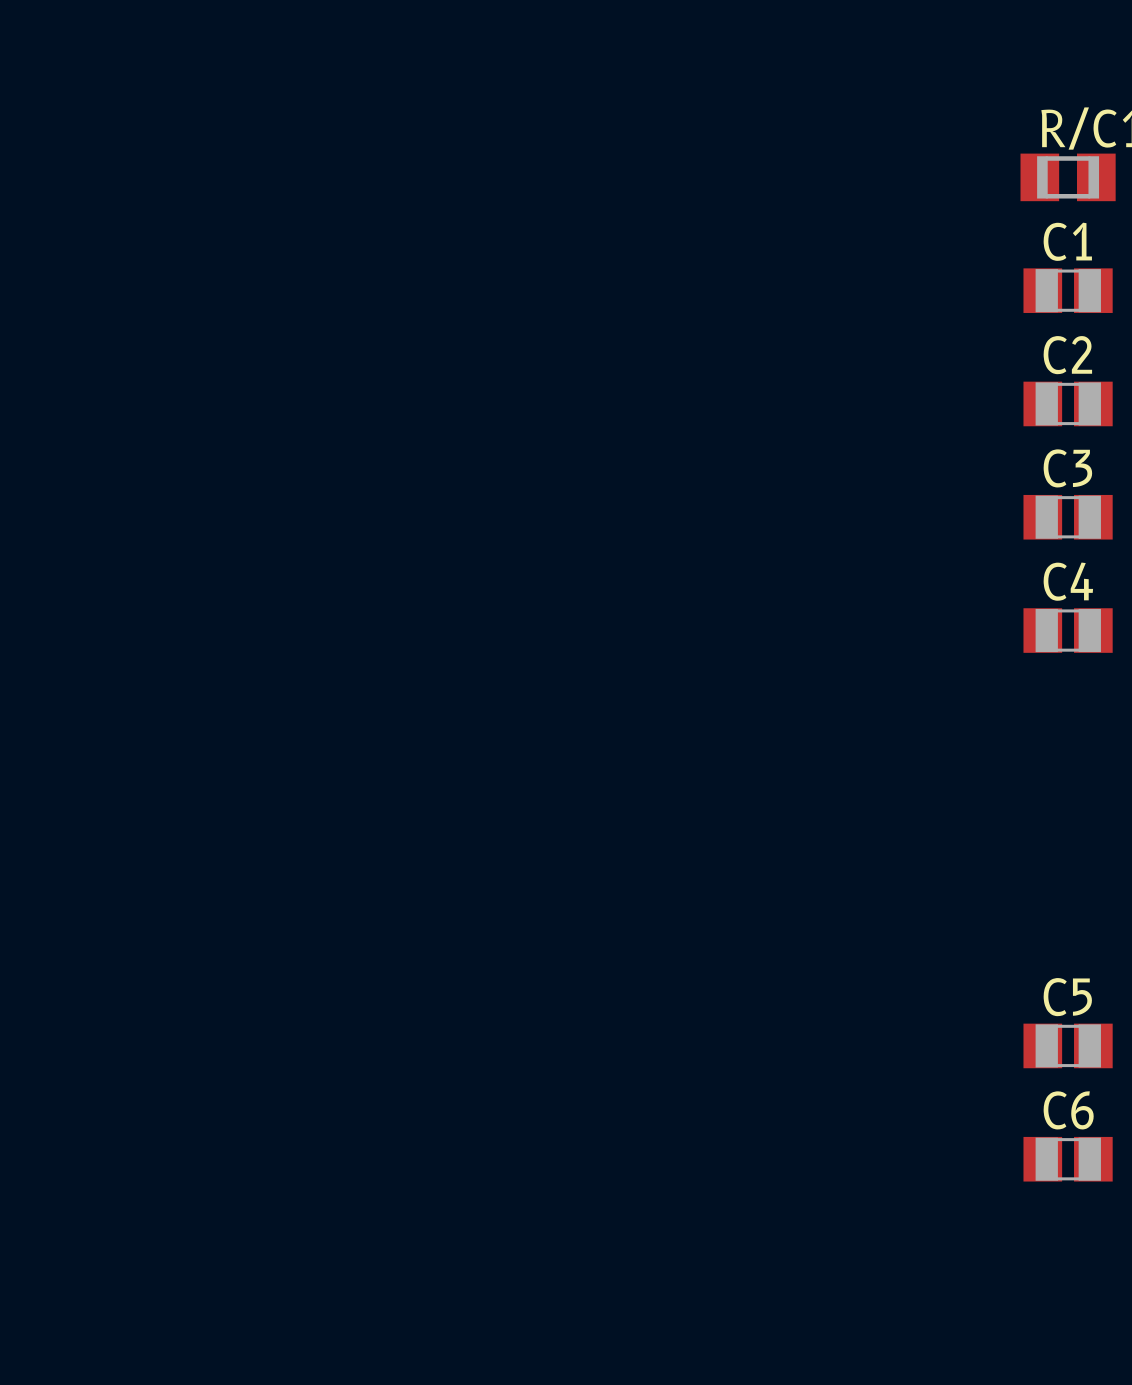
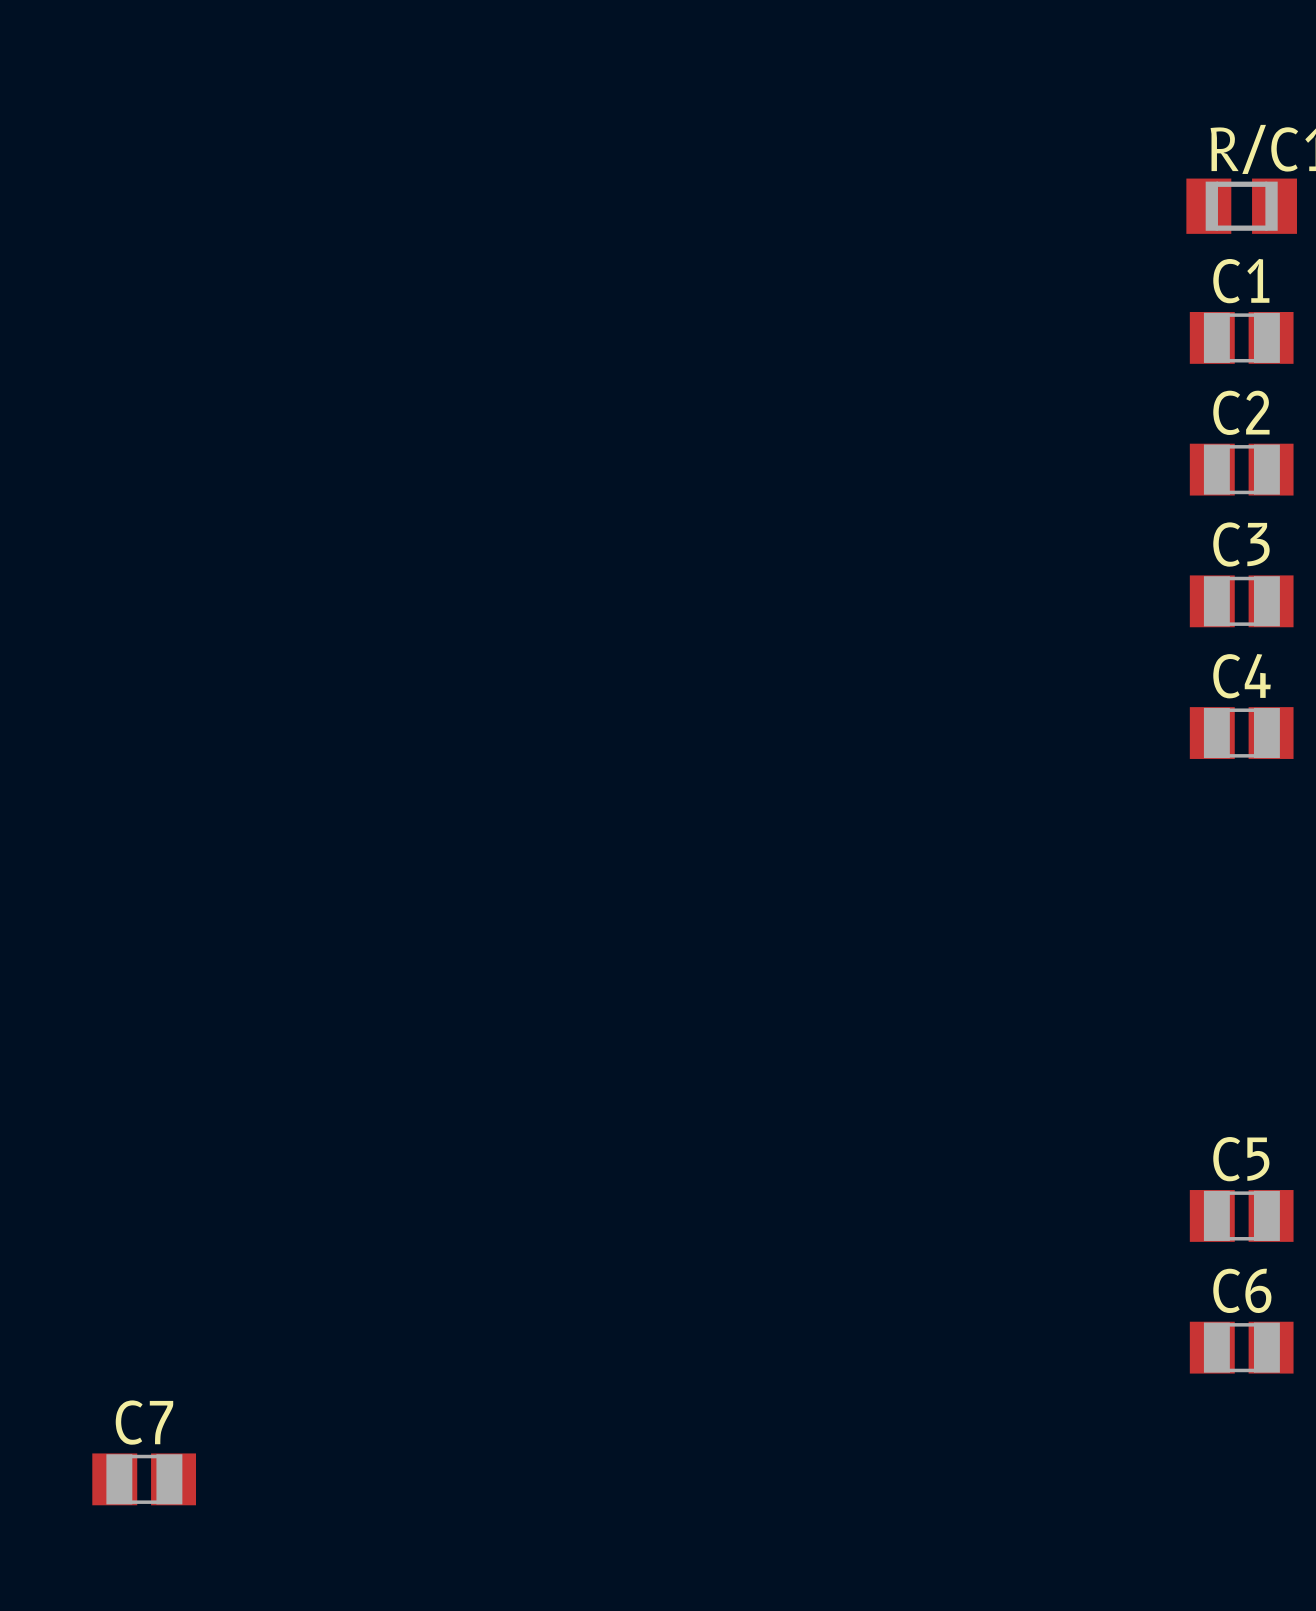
C7: none -> (144, 1479)

